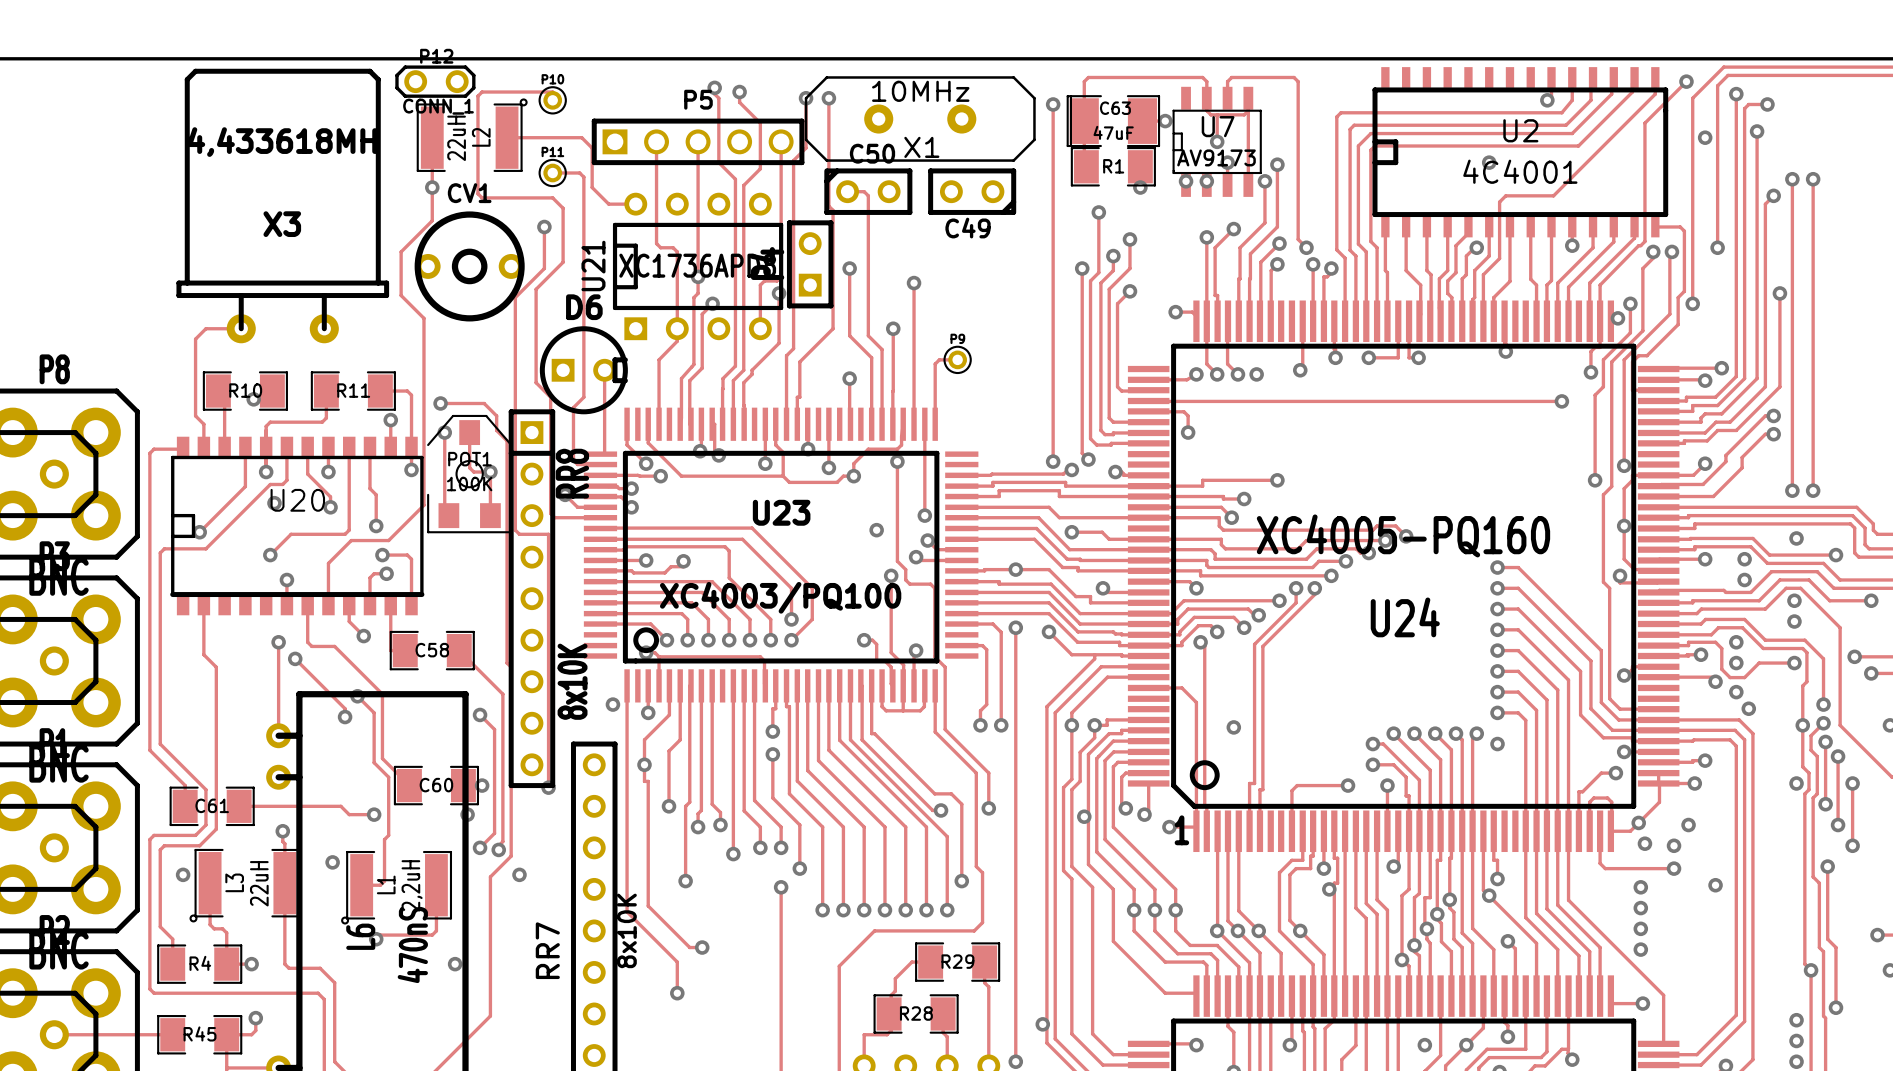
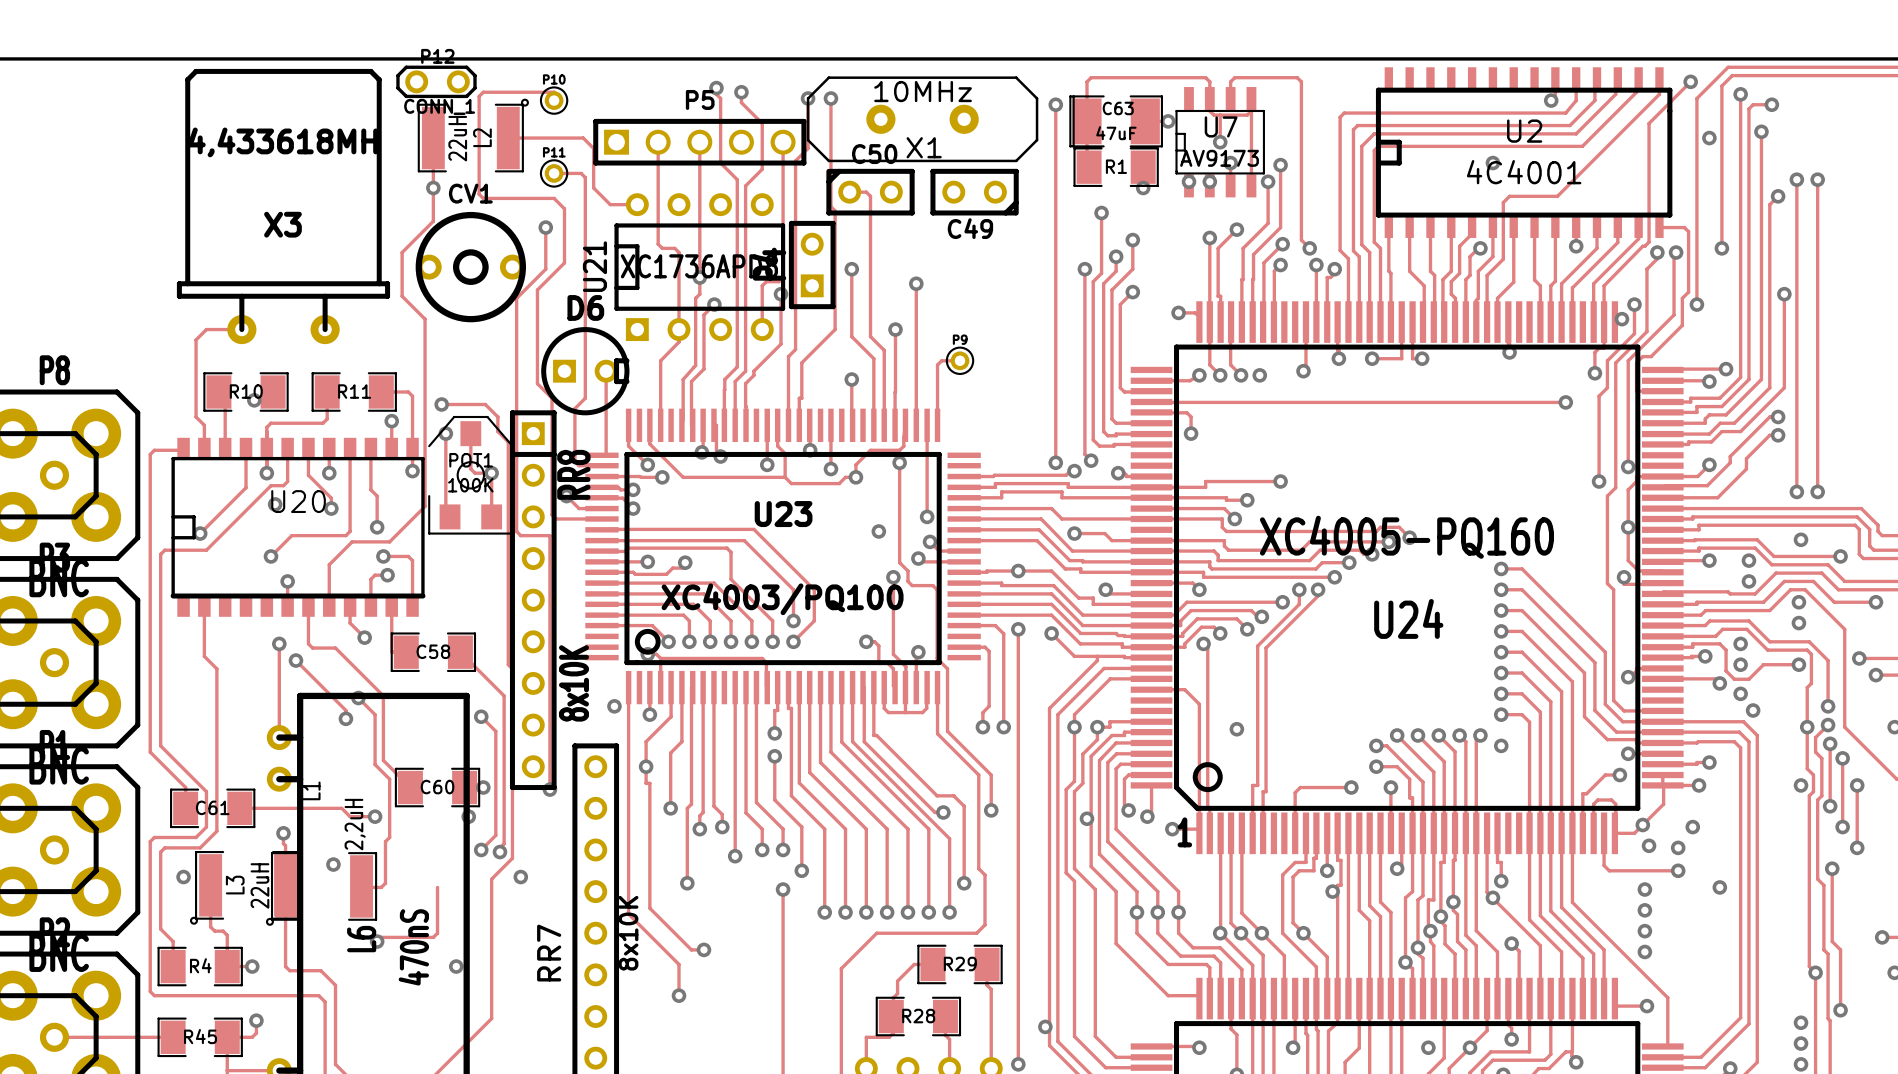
L1 name position: L1 (386, 884) -> L1 (311, 790)
L1 value position: 2,2uH (412, 885) -> 2,2uH (355, 824)
L1 position: (396, 887) -> (321, 888)

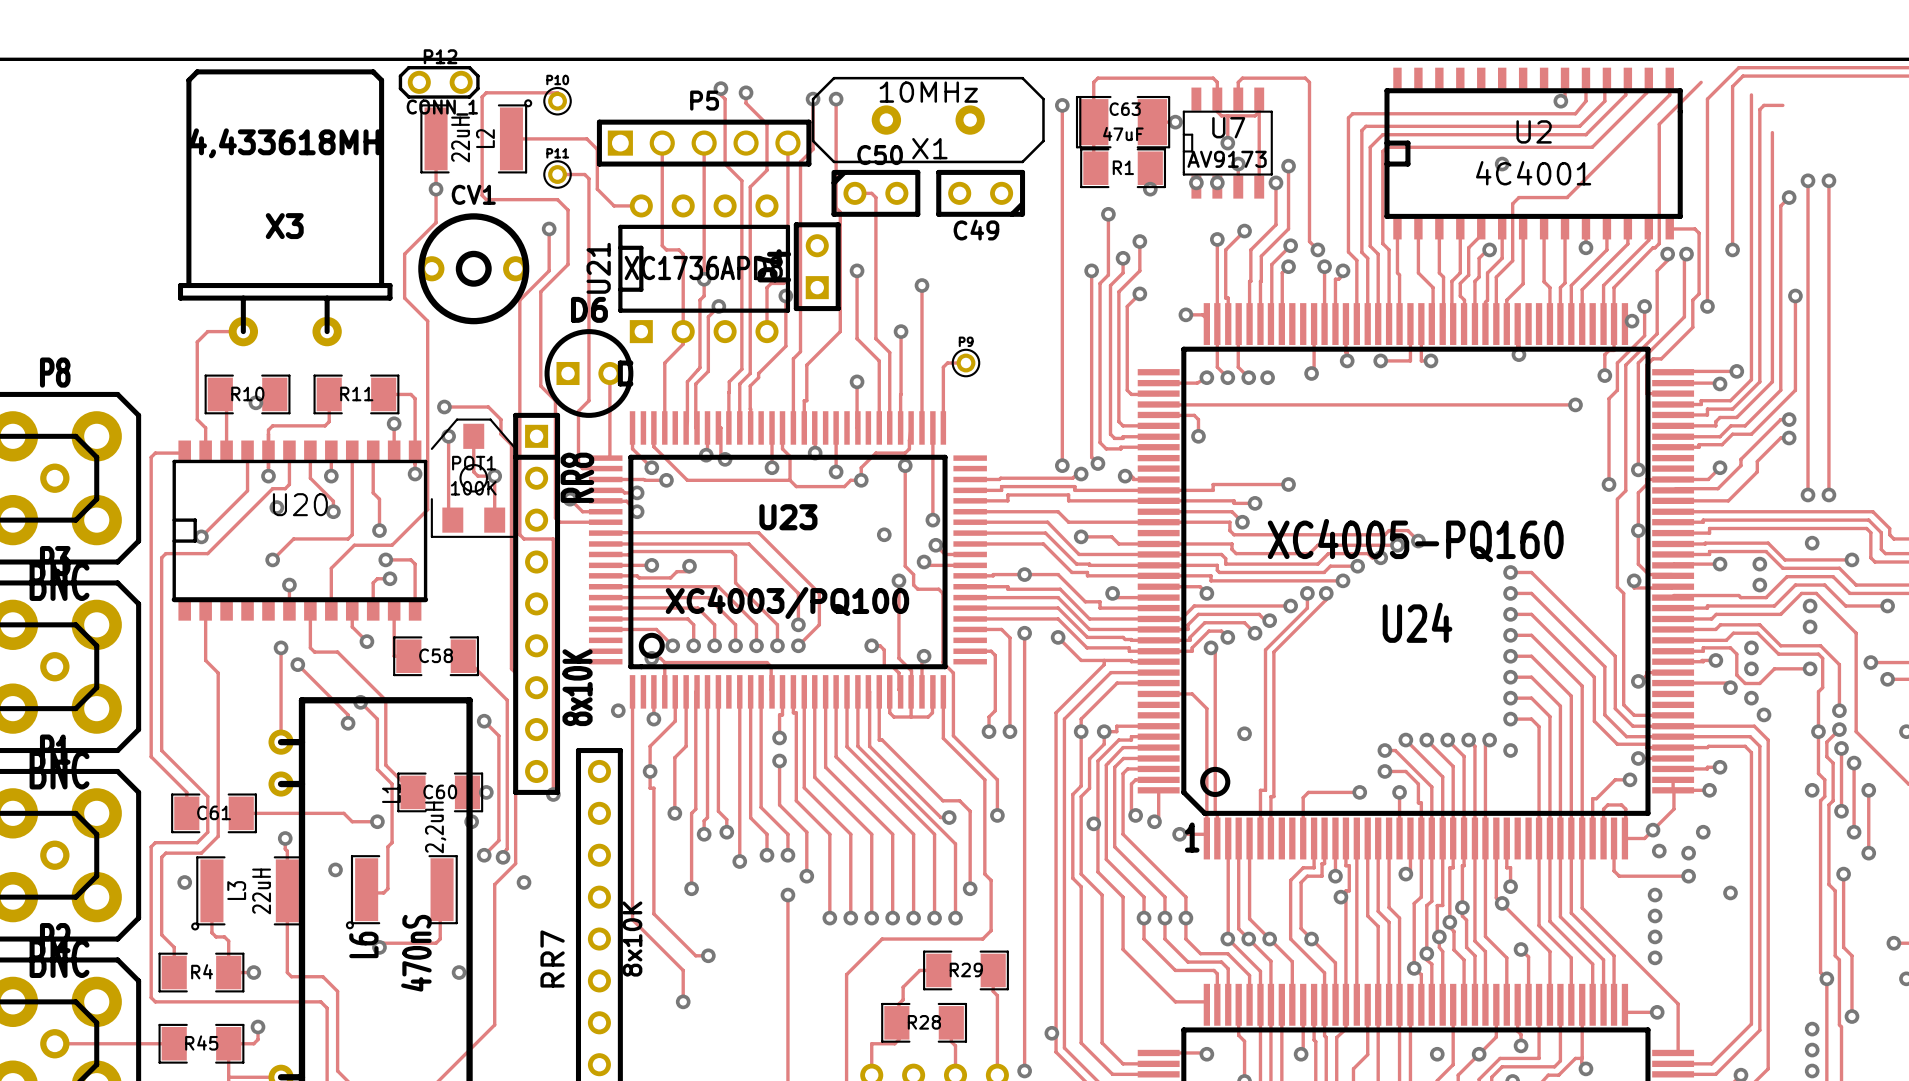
via: (1690, 81) -> none
via: (1740, 94) -> none
via: (1771, 104) -> none
via: (1761, 131) -> none
via: (1709, 138) -> none
L1 position: (321, 888) -> (401, 892)

